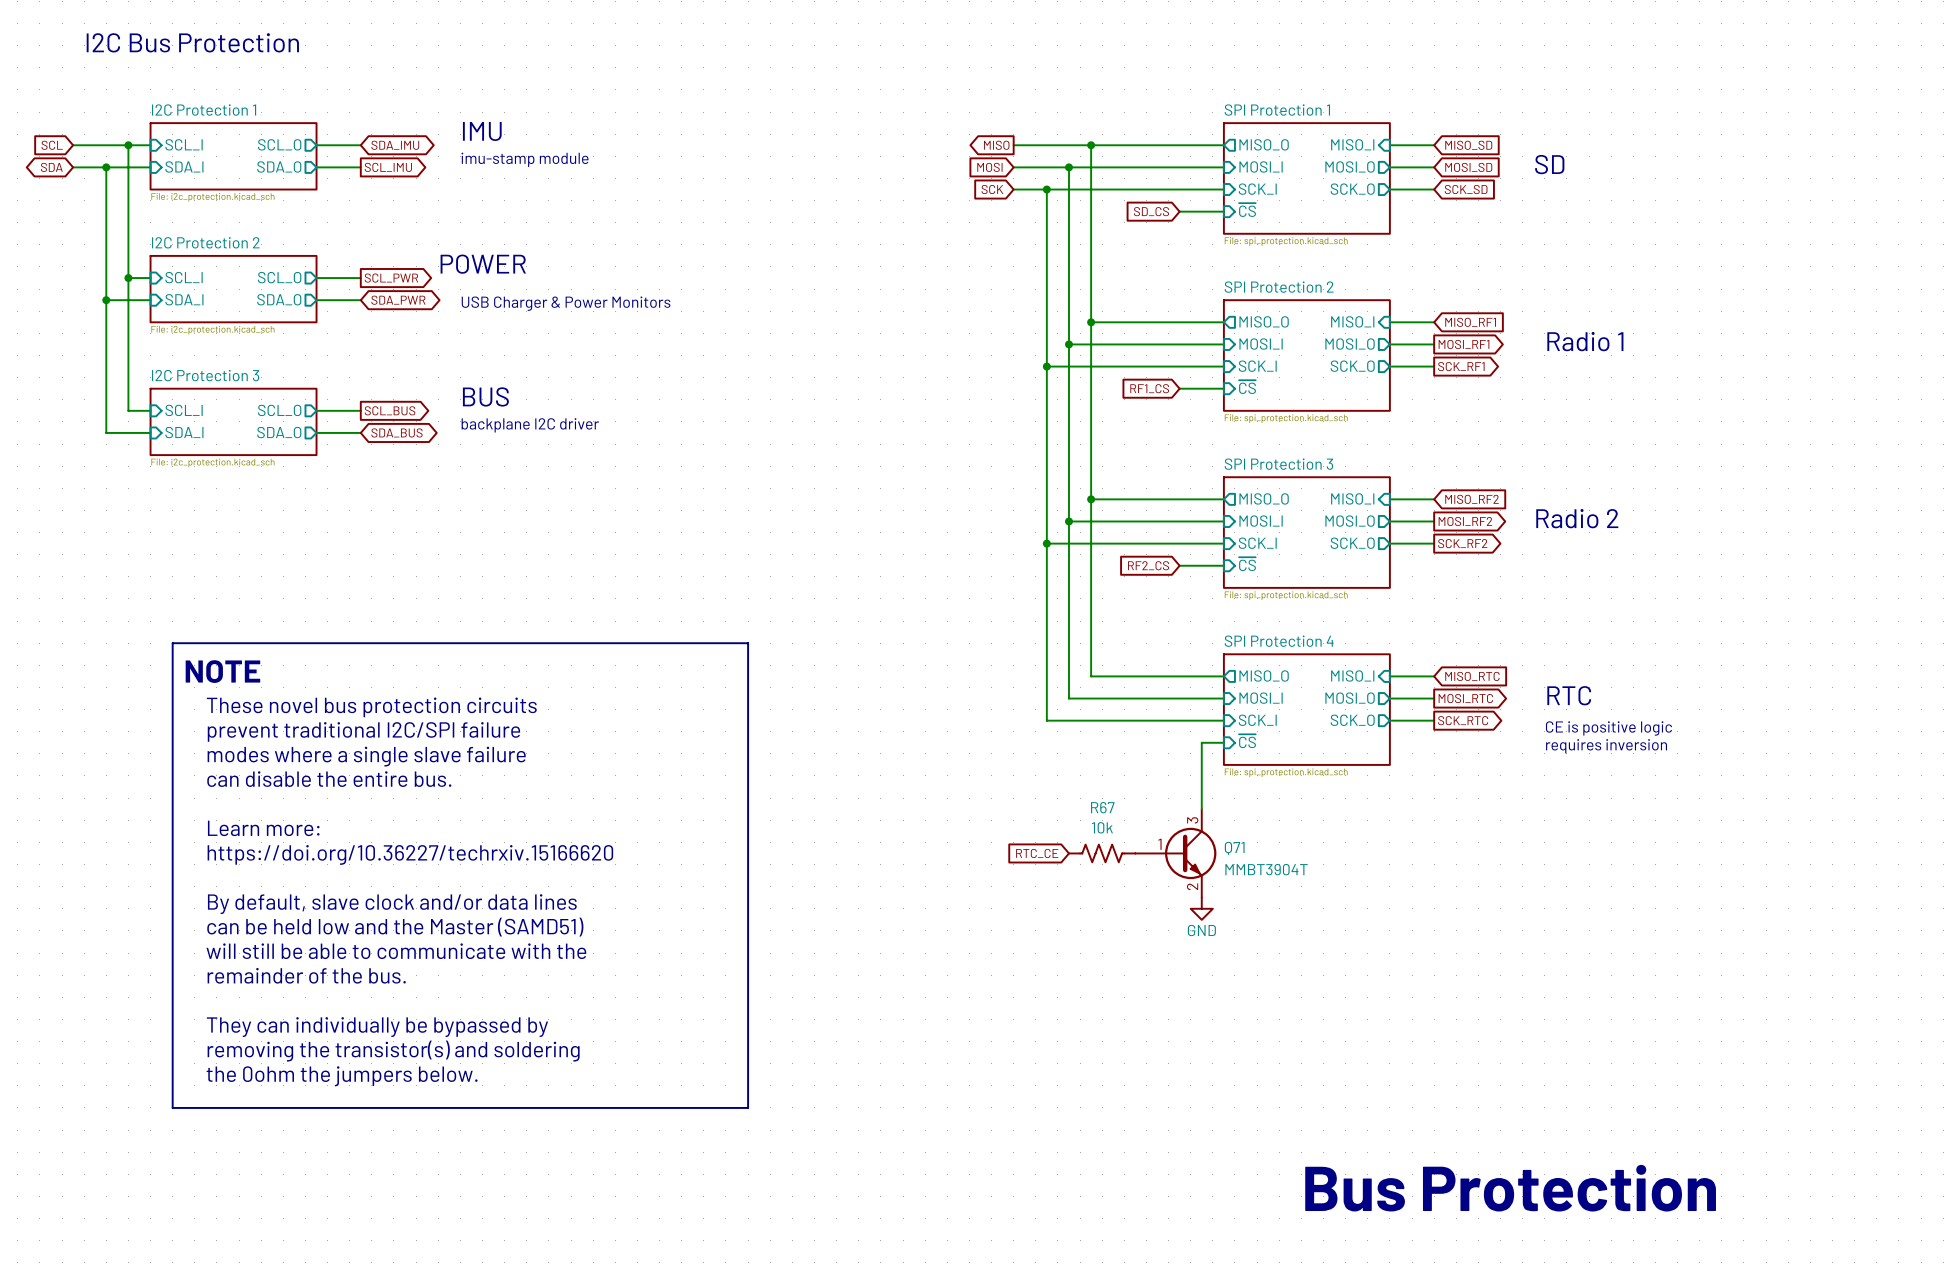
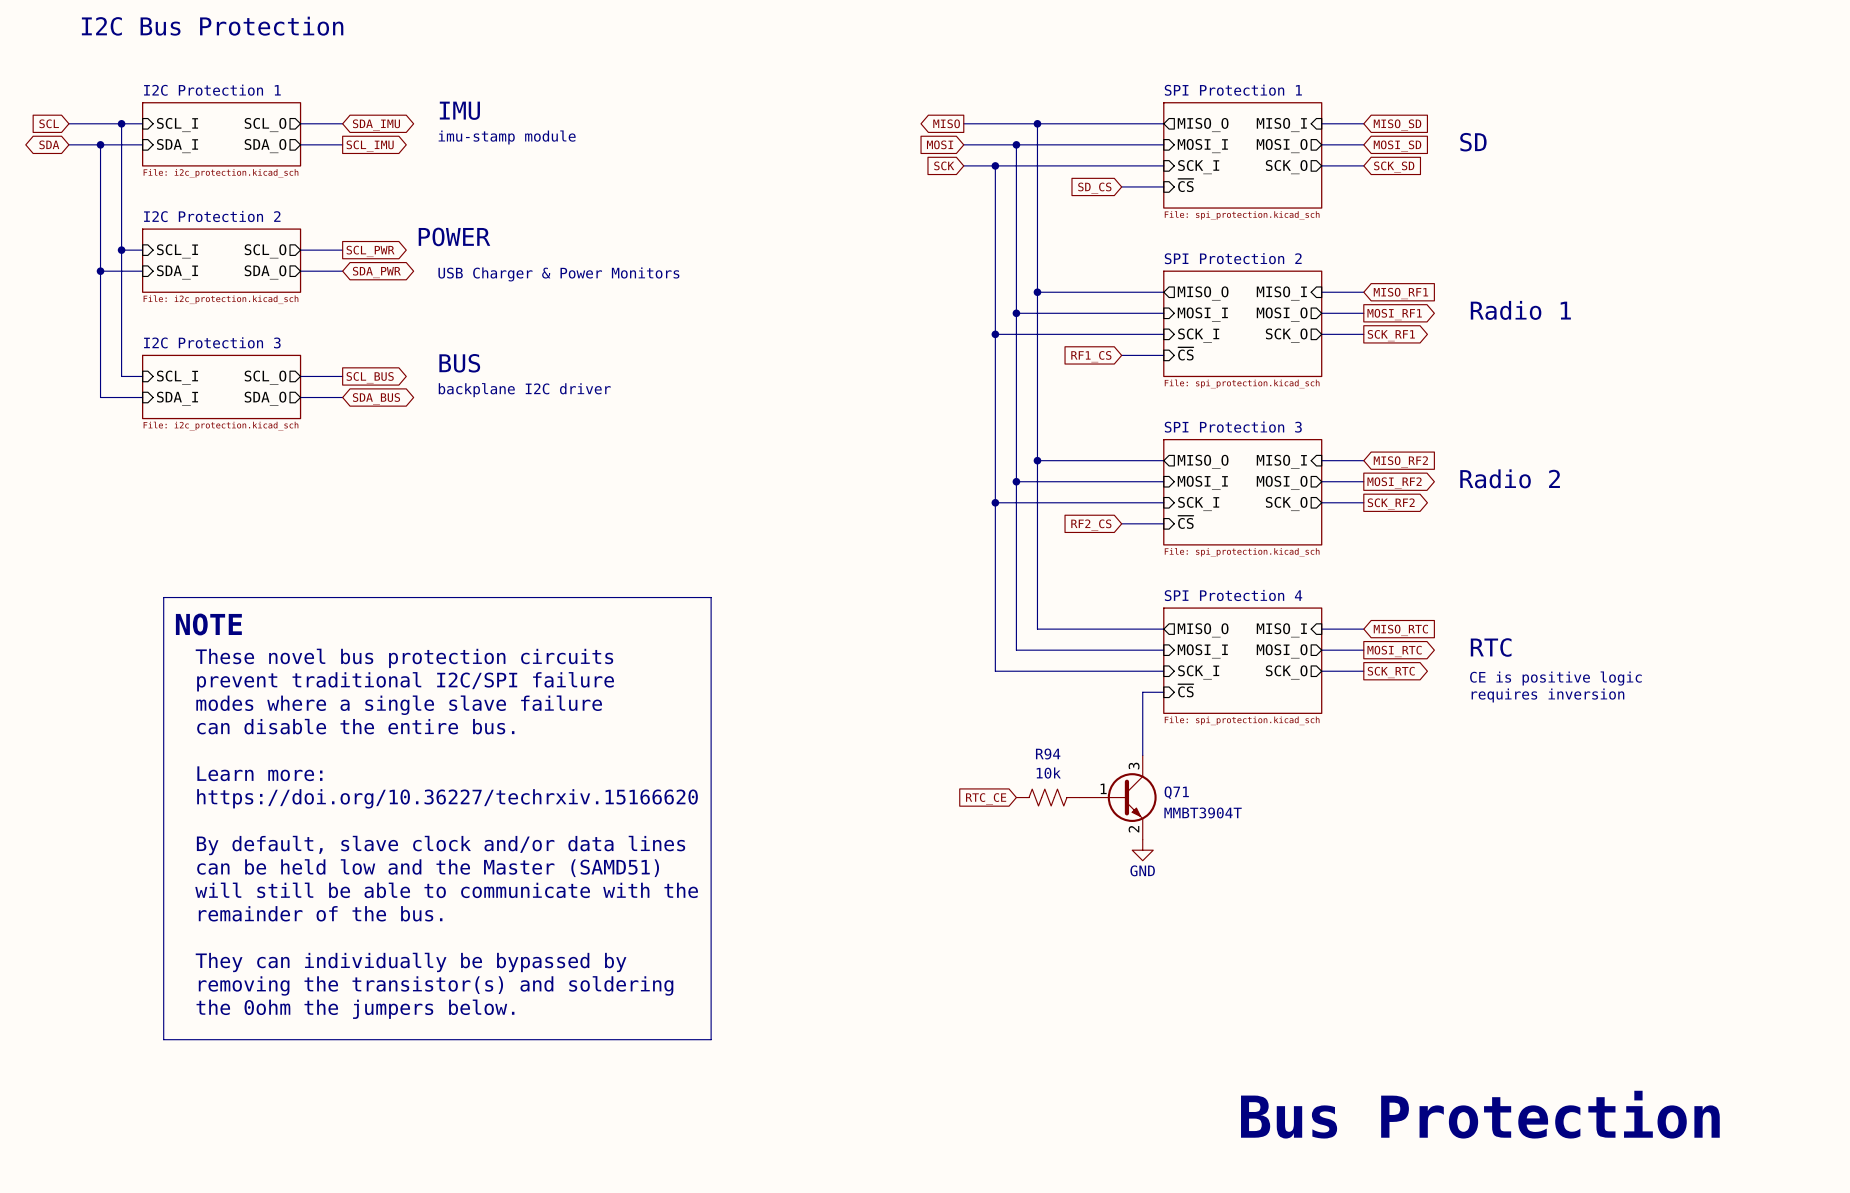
R67 name: R67 (1102, 807) -> R94 (1048, 754)

